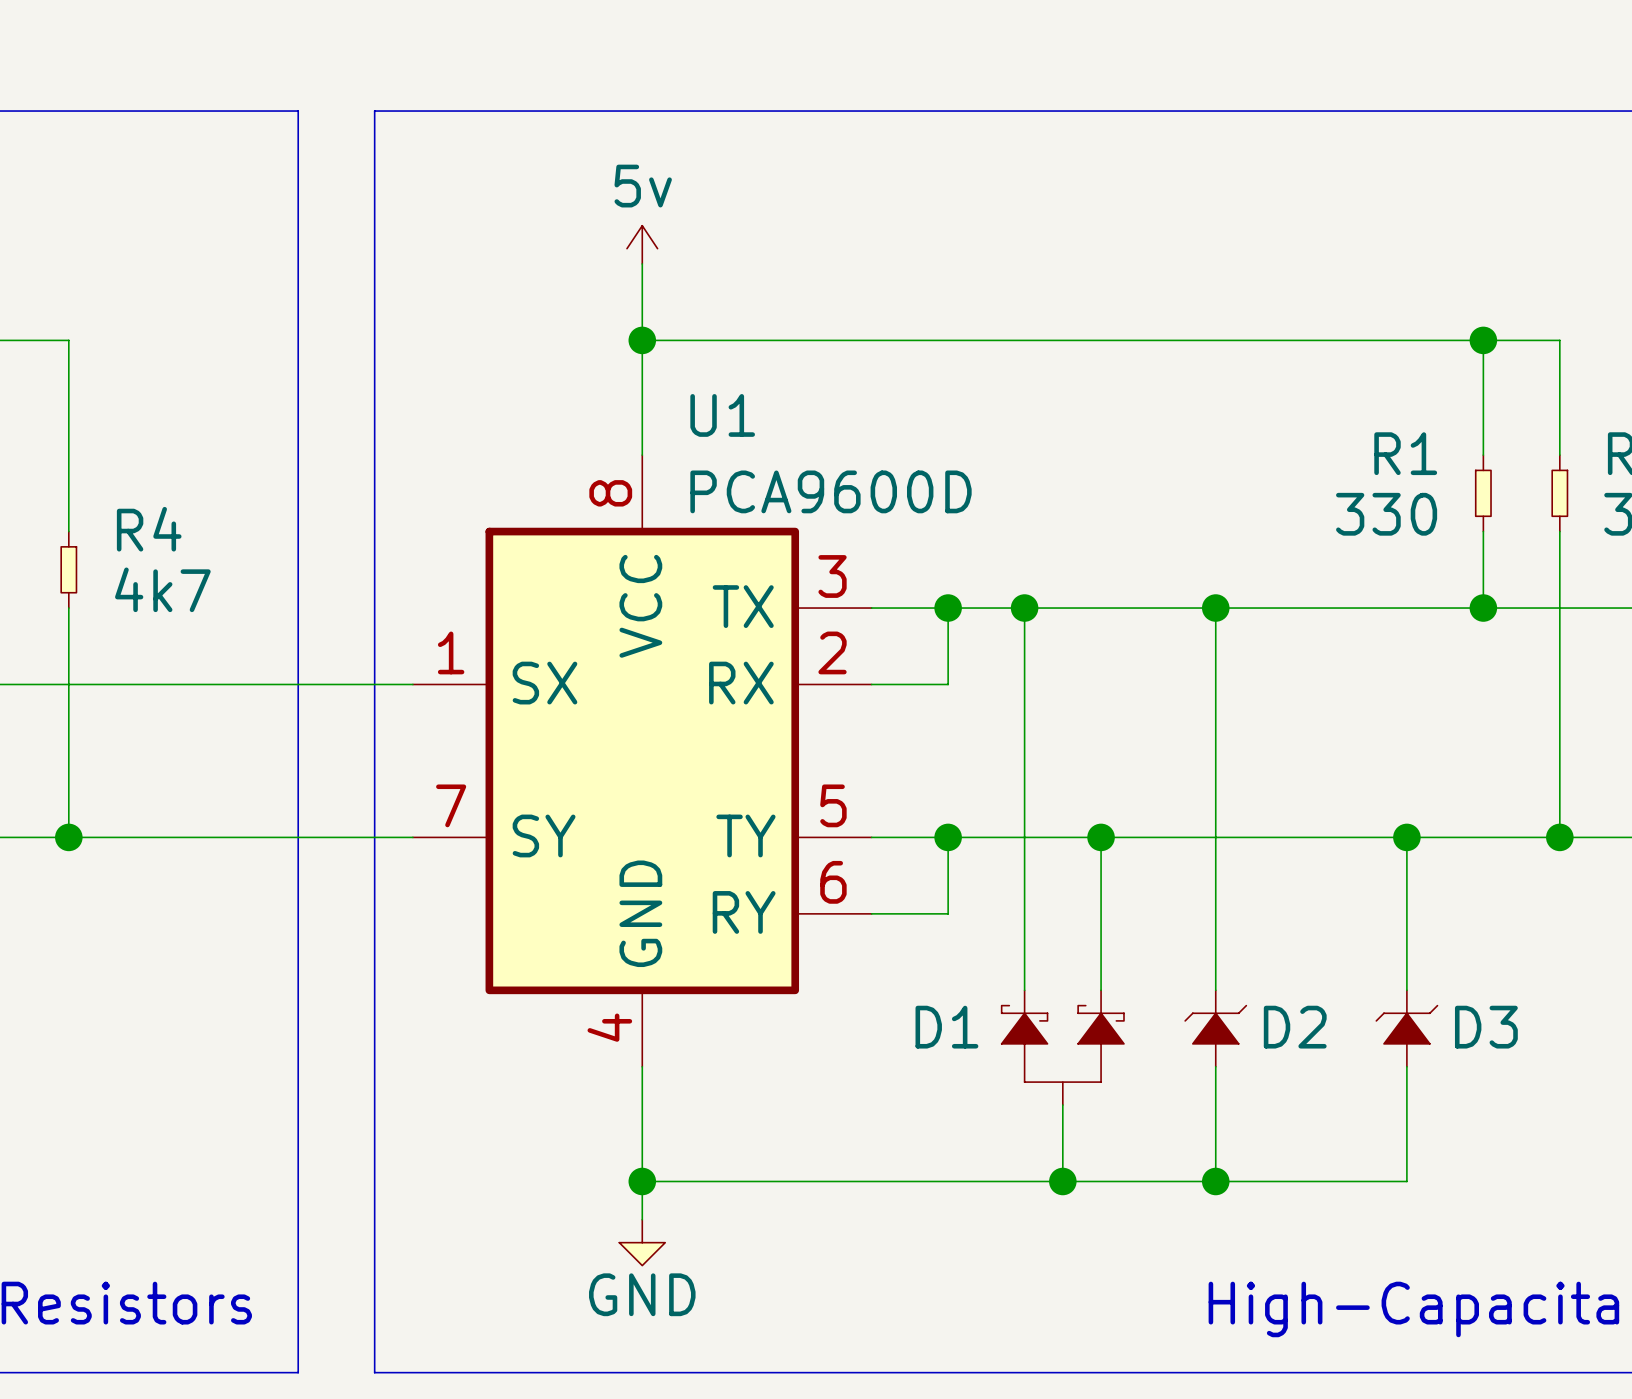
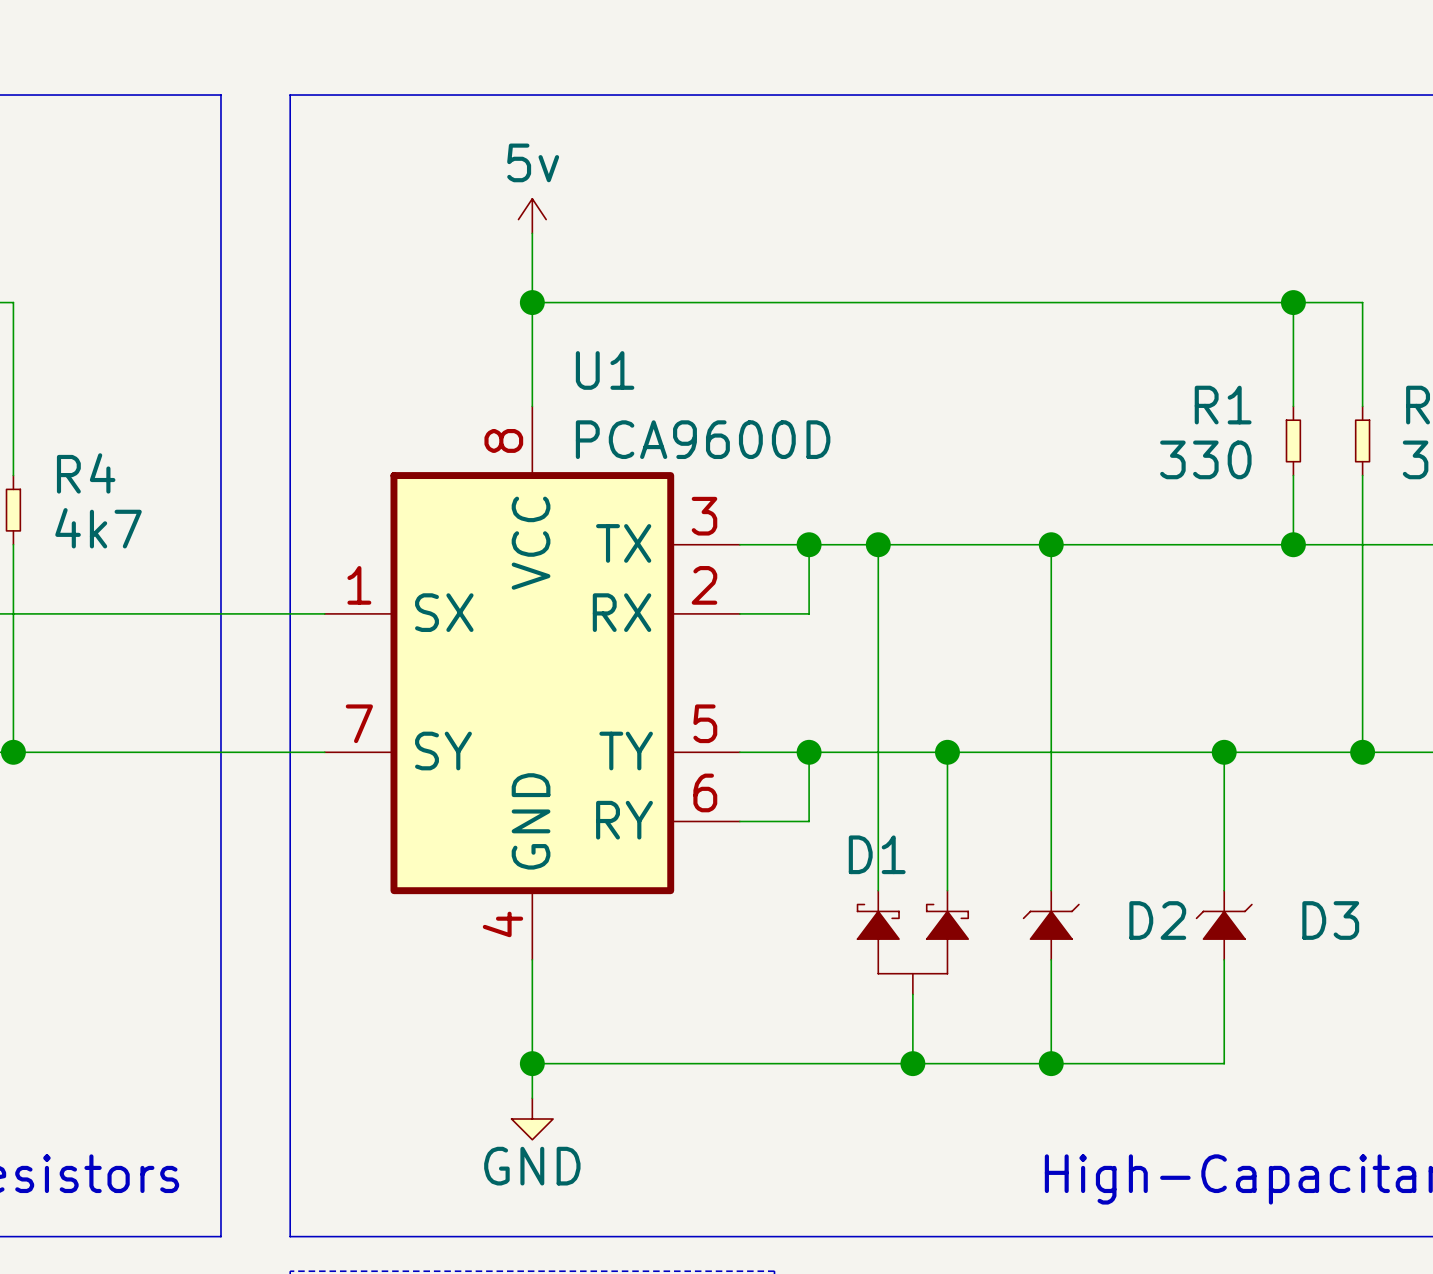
D1 name position: D1 (946, 1027) -> D1 (877, 854)
D2 name position: D2 (1295, 1027) -> D2 (1157, 920)
D3 name position: D3 (1486, 1027) -> D3 (1330, 920)

